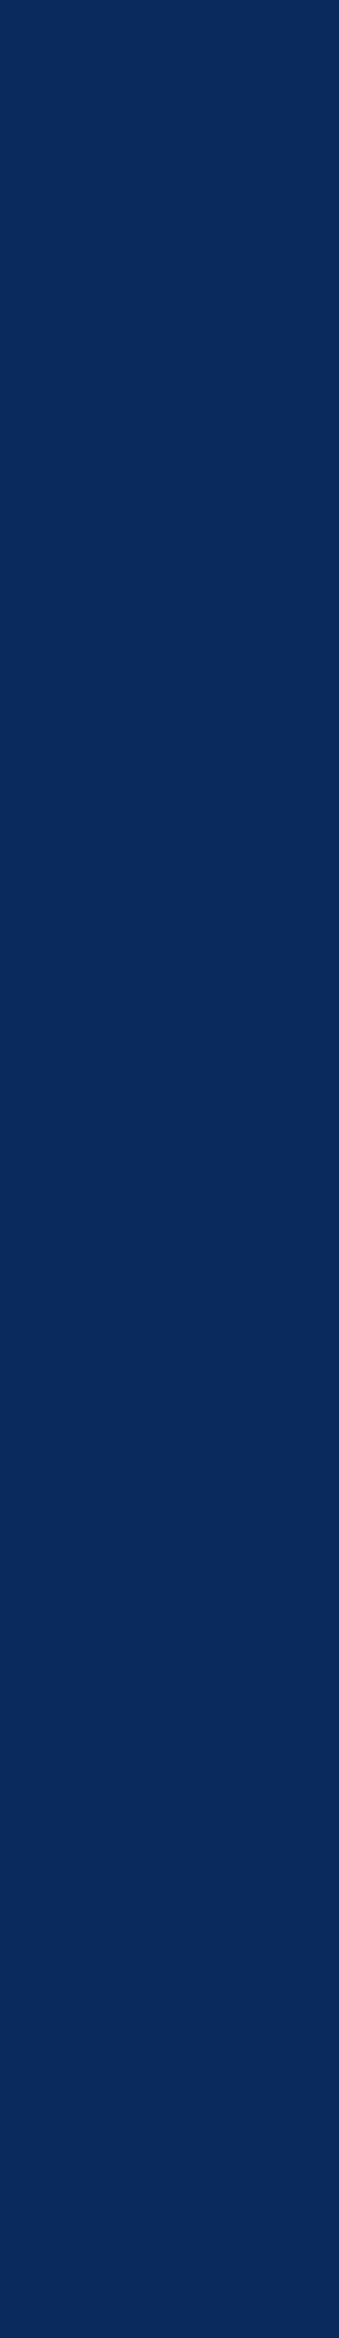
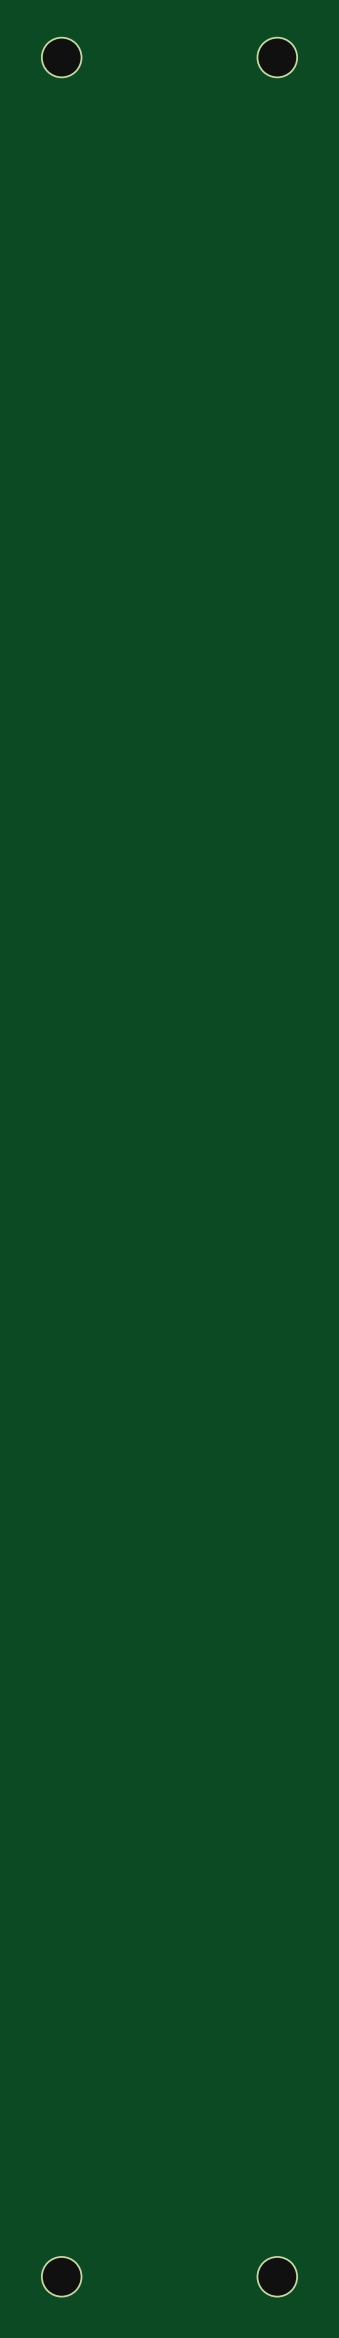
part: none -> (61, 57)
part: none -> (277, 57)
part: none -> (61, 2276)
part: none -> (277, 2276)

